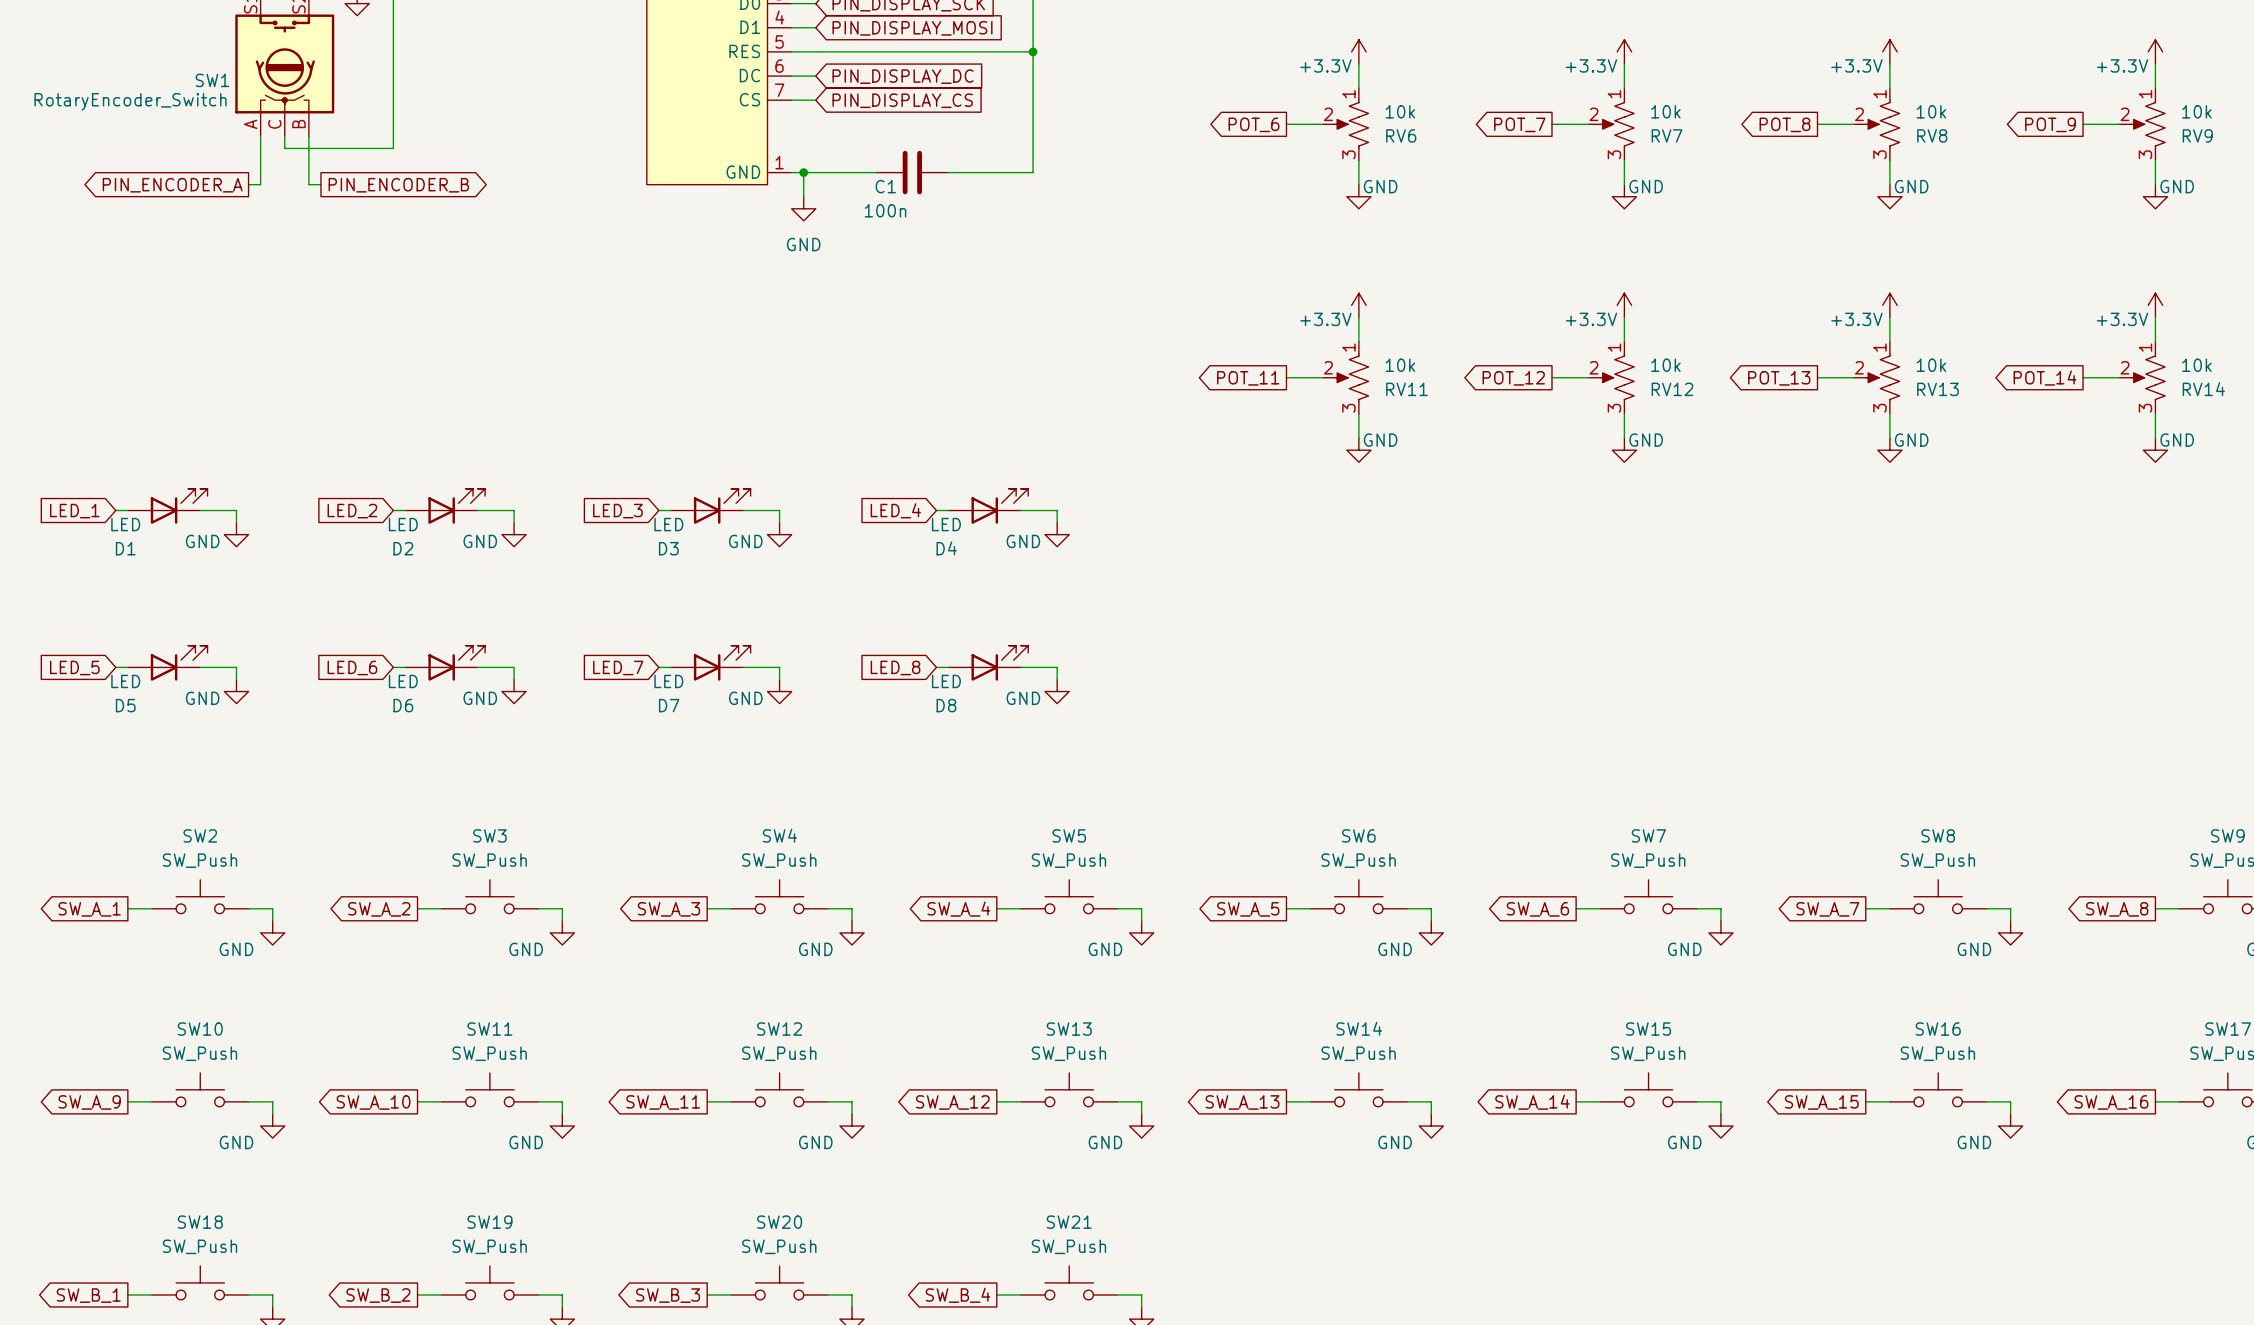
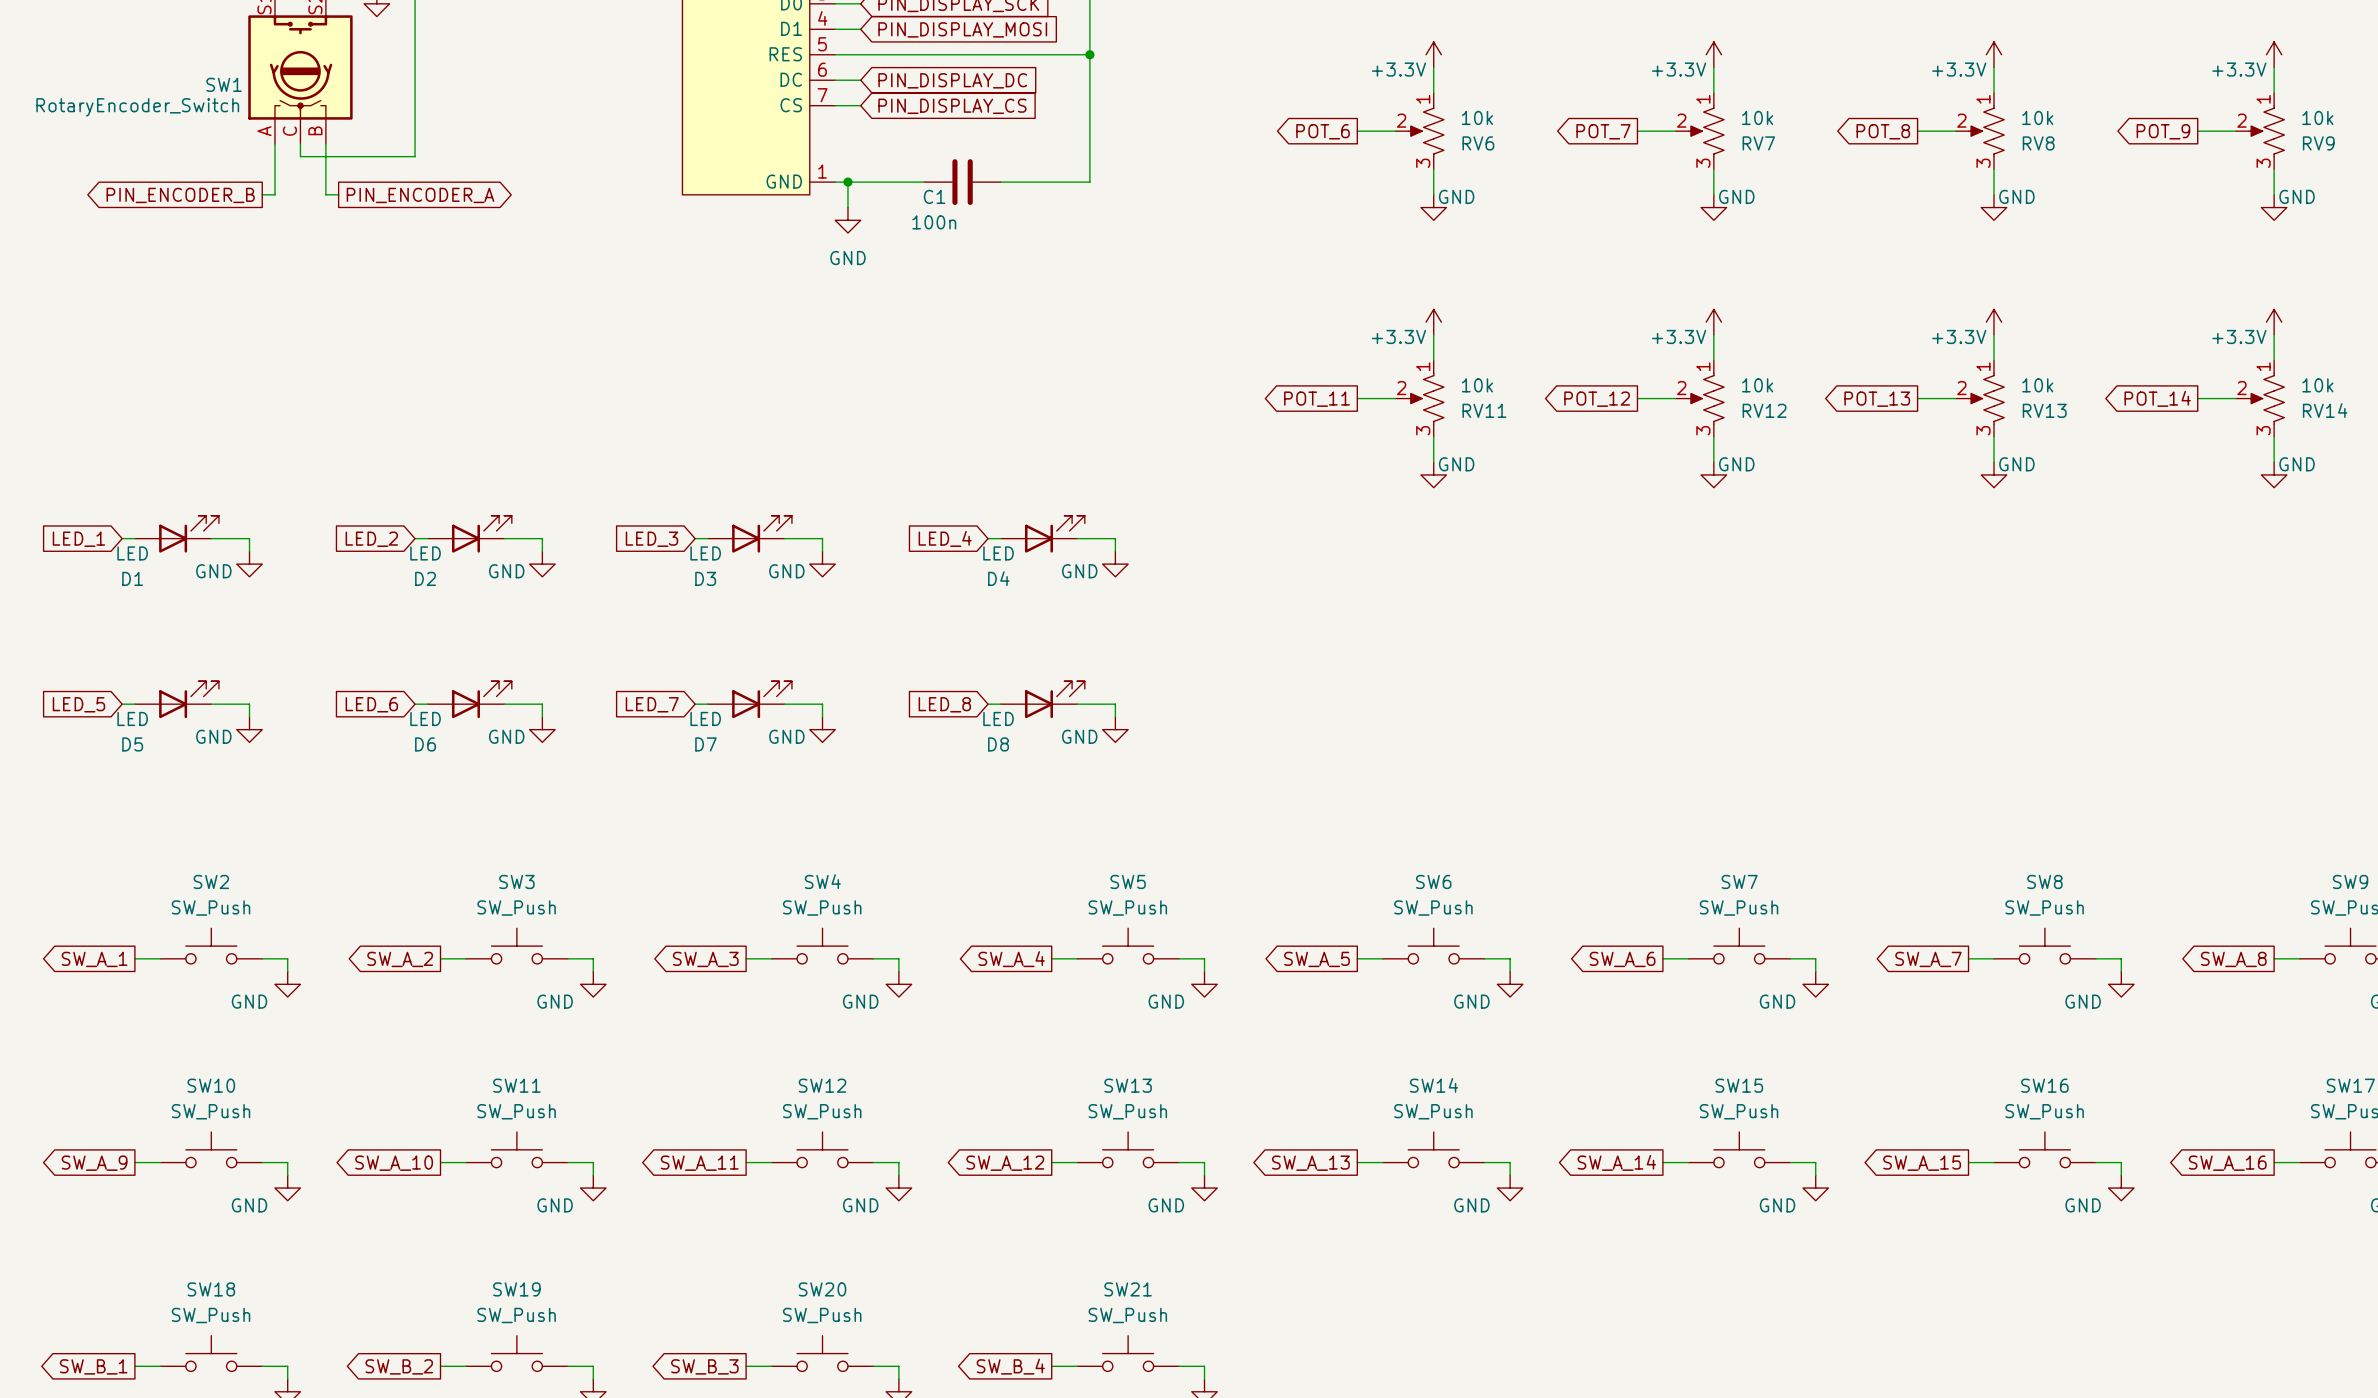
global label: PIN_ENCODER_A (172, 185) -> PIN_ENCODER_B (180, 195)
global label: PIN_ENCODER_B (398, 185) -> PIN_ENCODER_A (420, 195)

